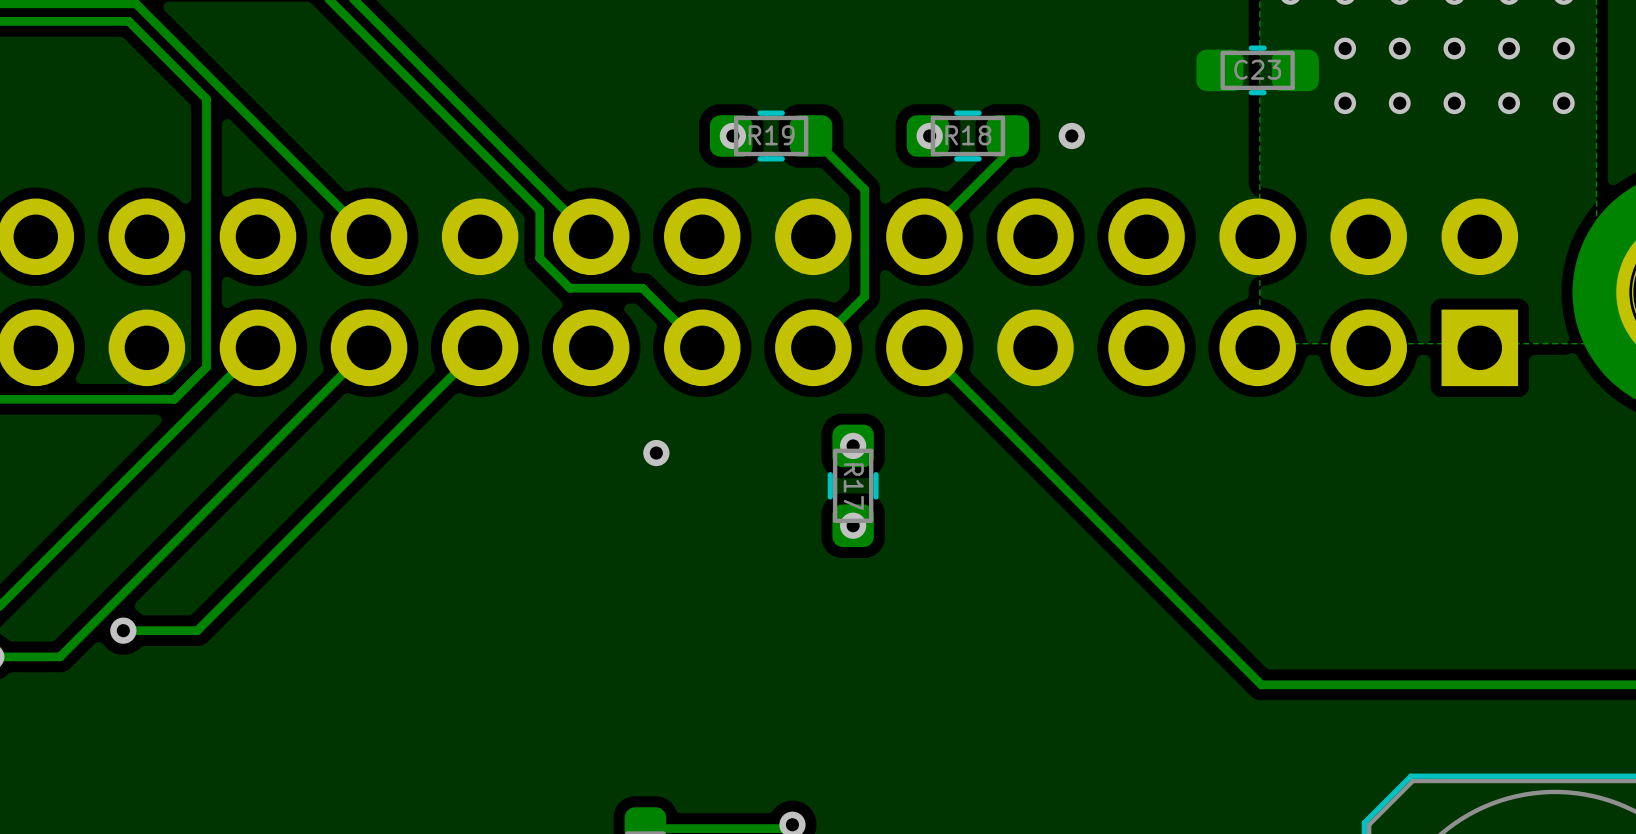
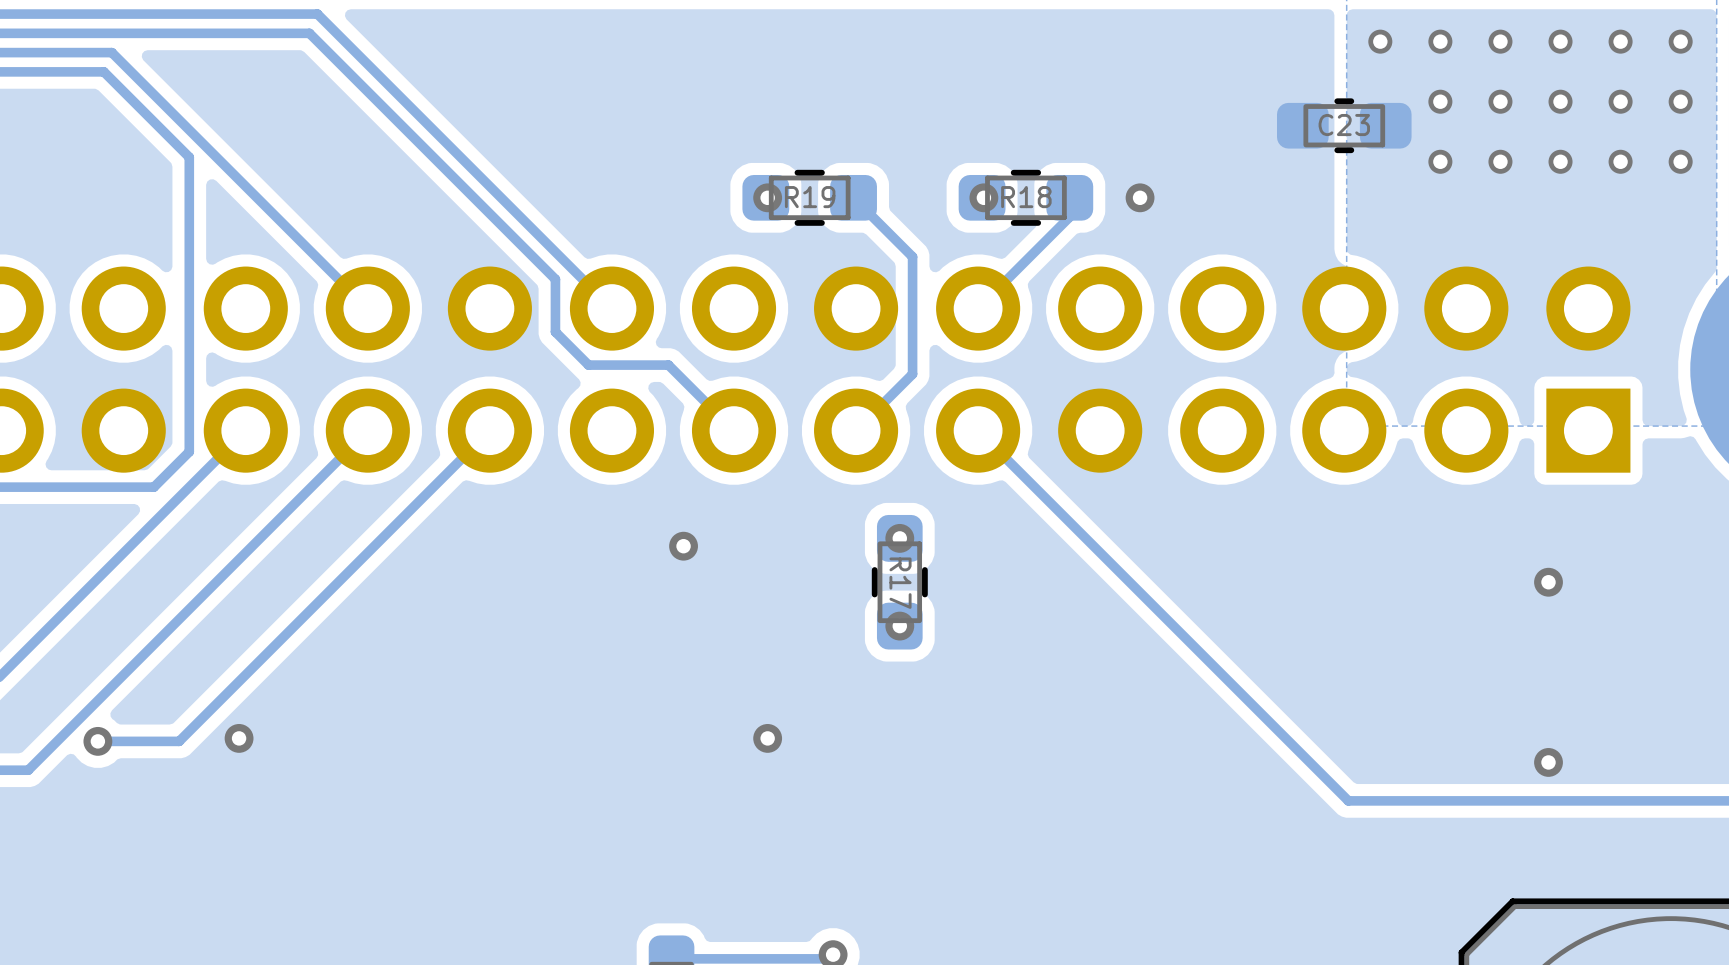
via: none -> (1548, 582)
via: none -> (239, 738)
via: none -> (767, 738)
via: none -> (1548, 762)

